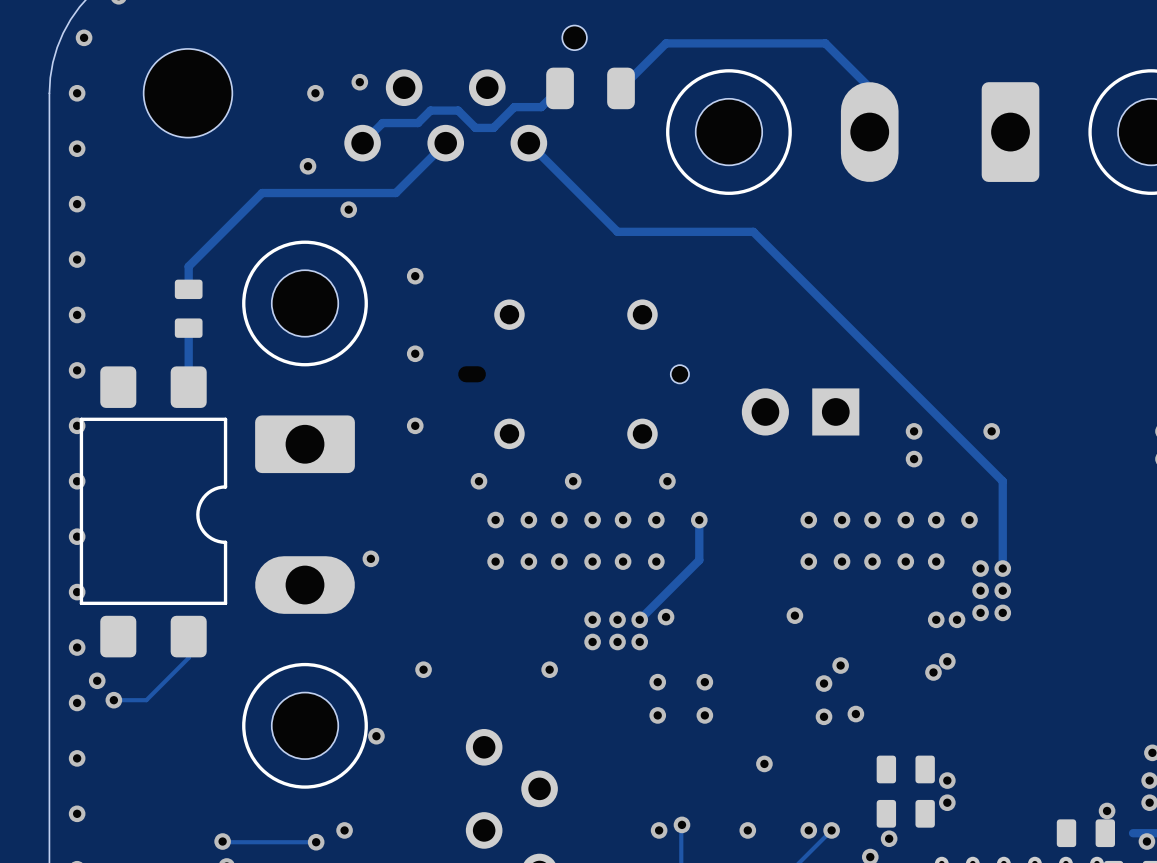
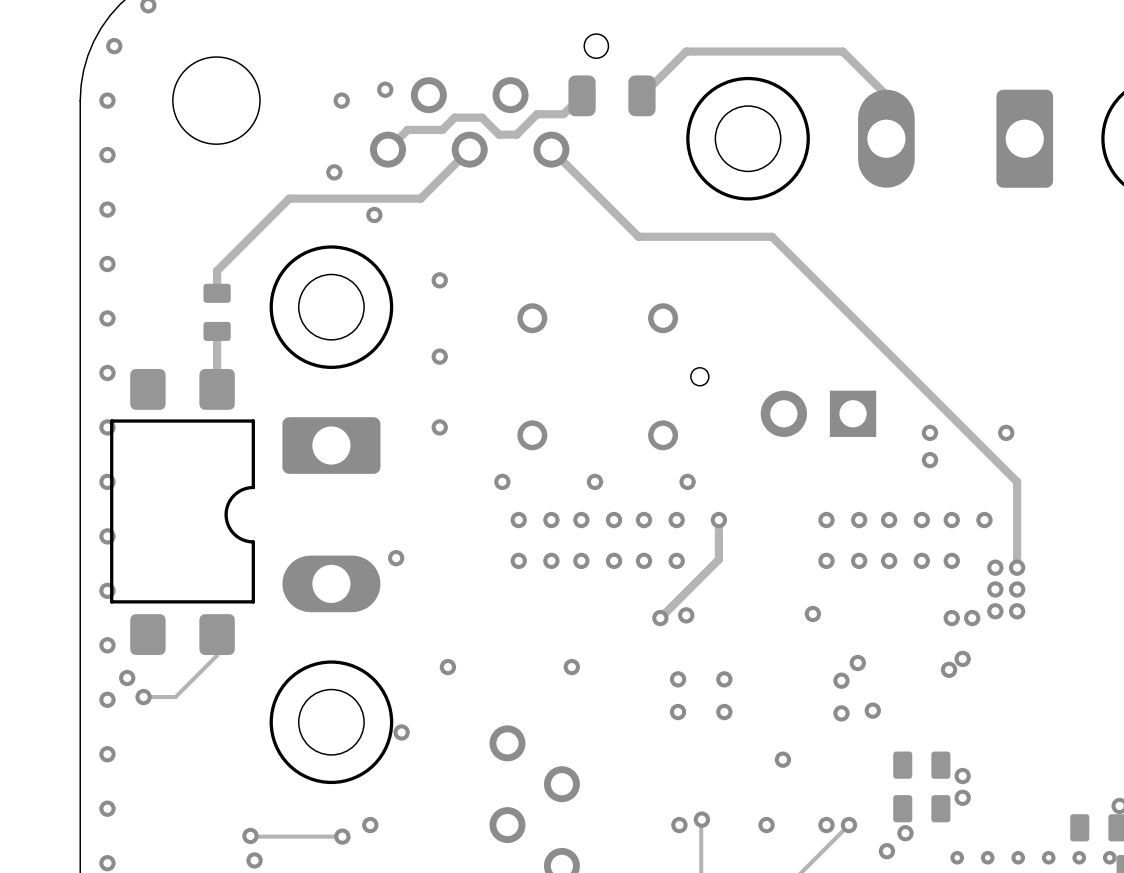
via: (592, 619) -> none
via: (617, 619) -> none
via: (592, 641) -> none
via: (617, 641) -> none
via: (639, 641) -> none

